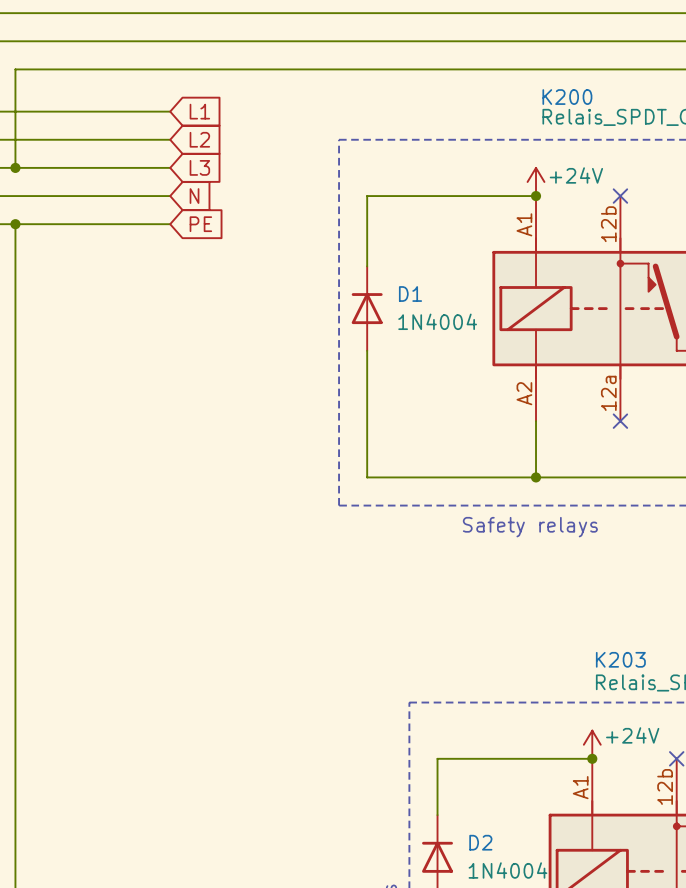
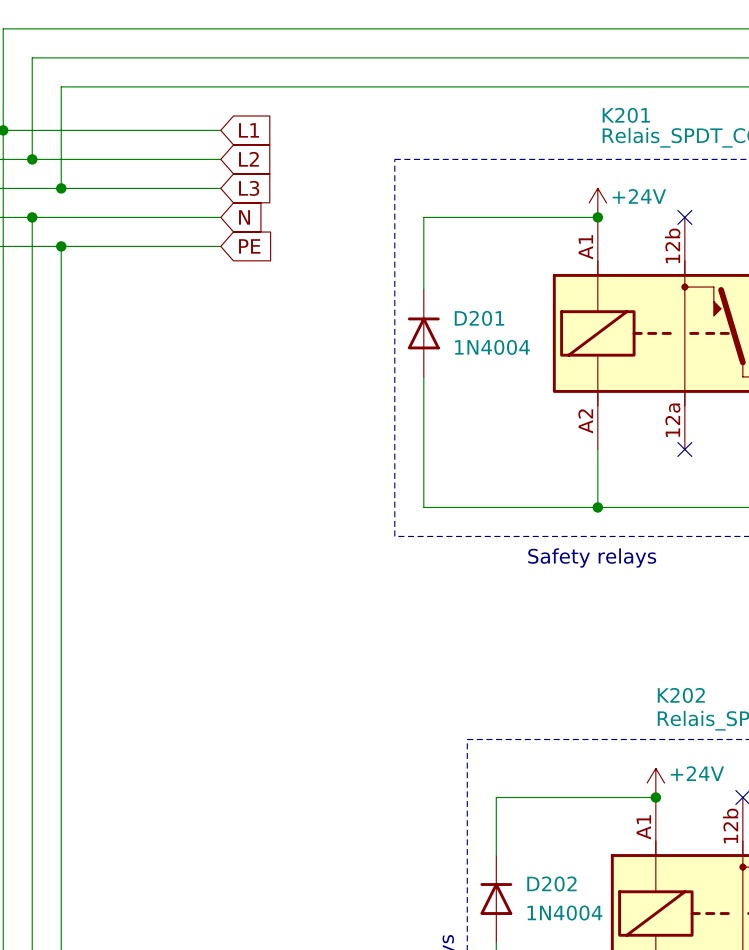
K200 name: K200 (567, 97) -> K201 (626, 115)
D1 name: D1 (410, 294) -> D201 (479, 318)
K203 name: K203 (620, 659) -> K202 (681, 695)
D2 name: D2 (480, 842) -> D202 (551, 883)

